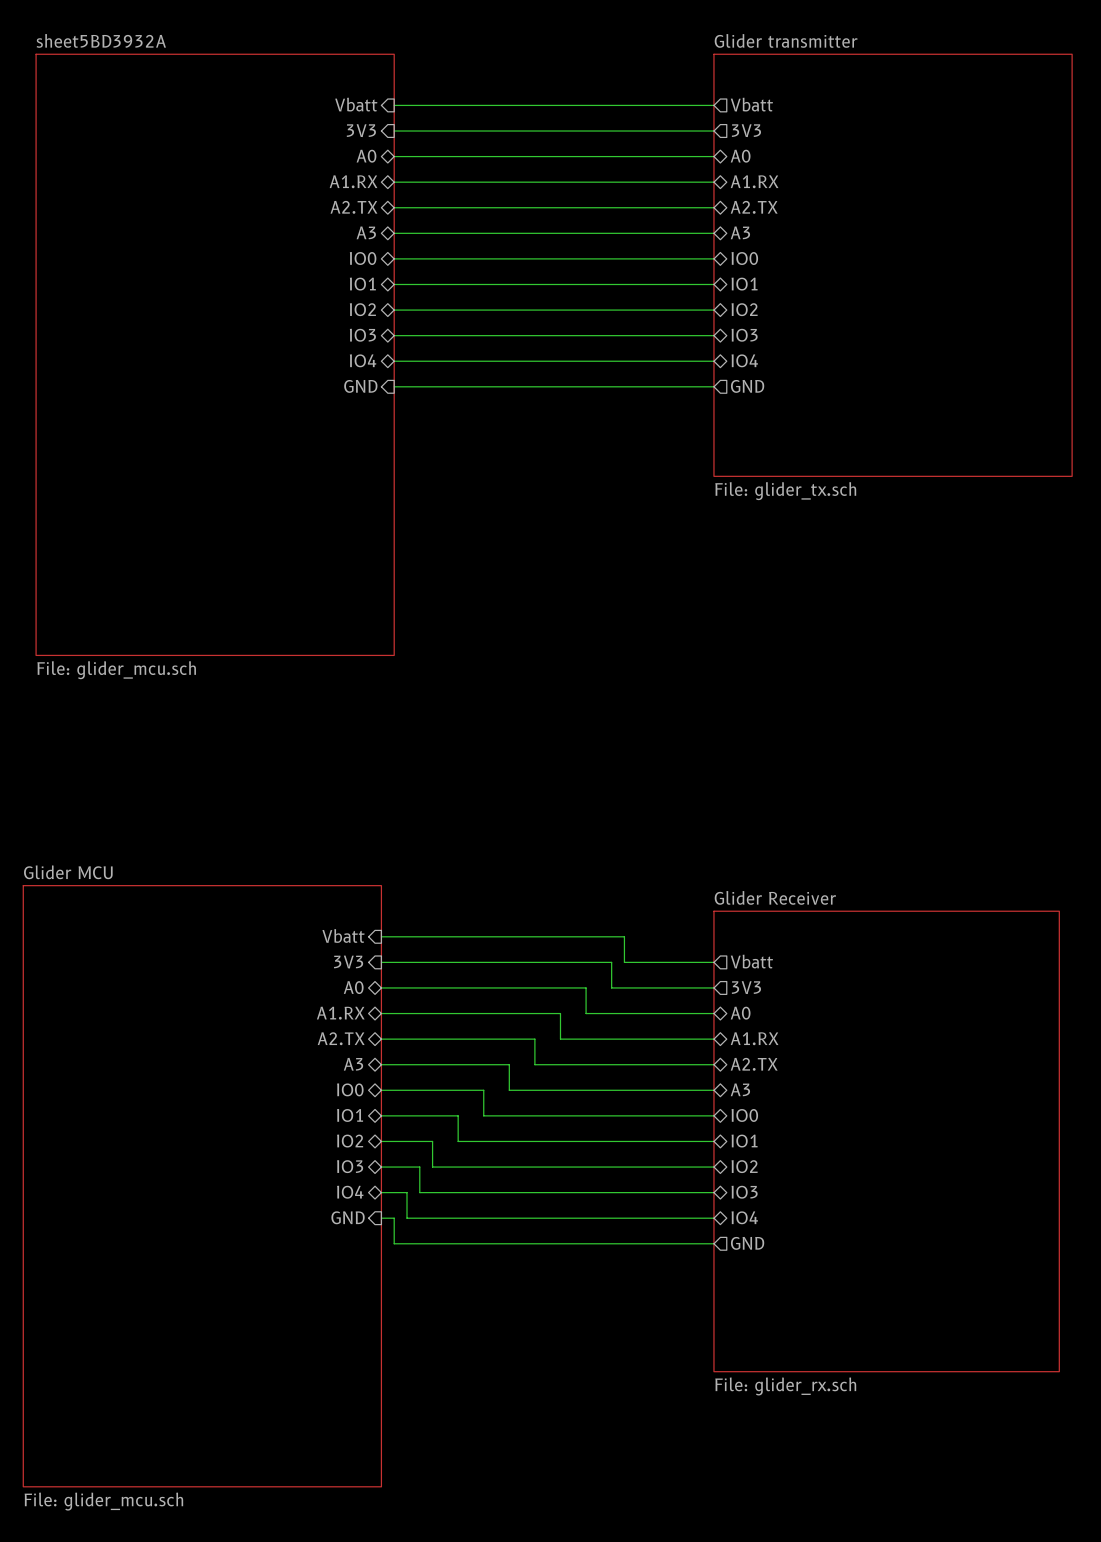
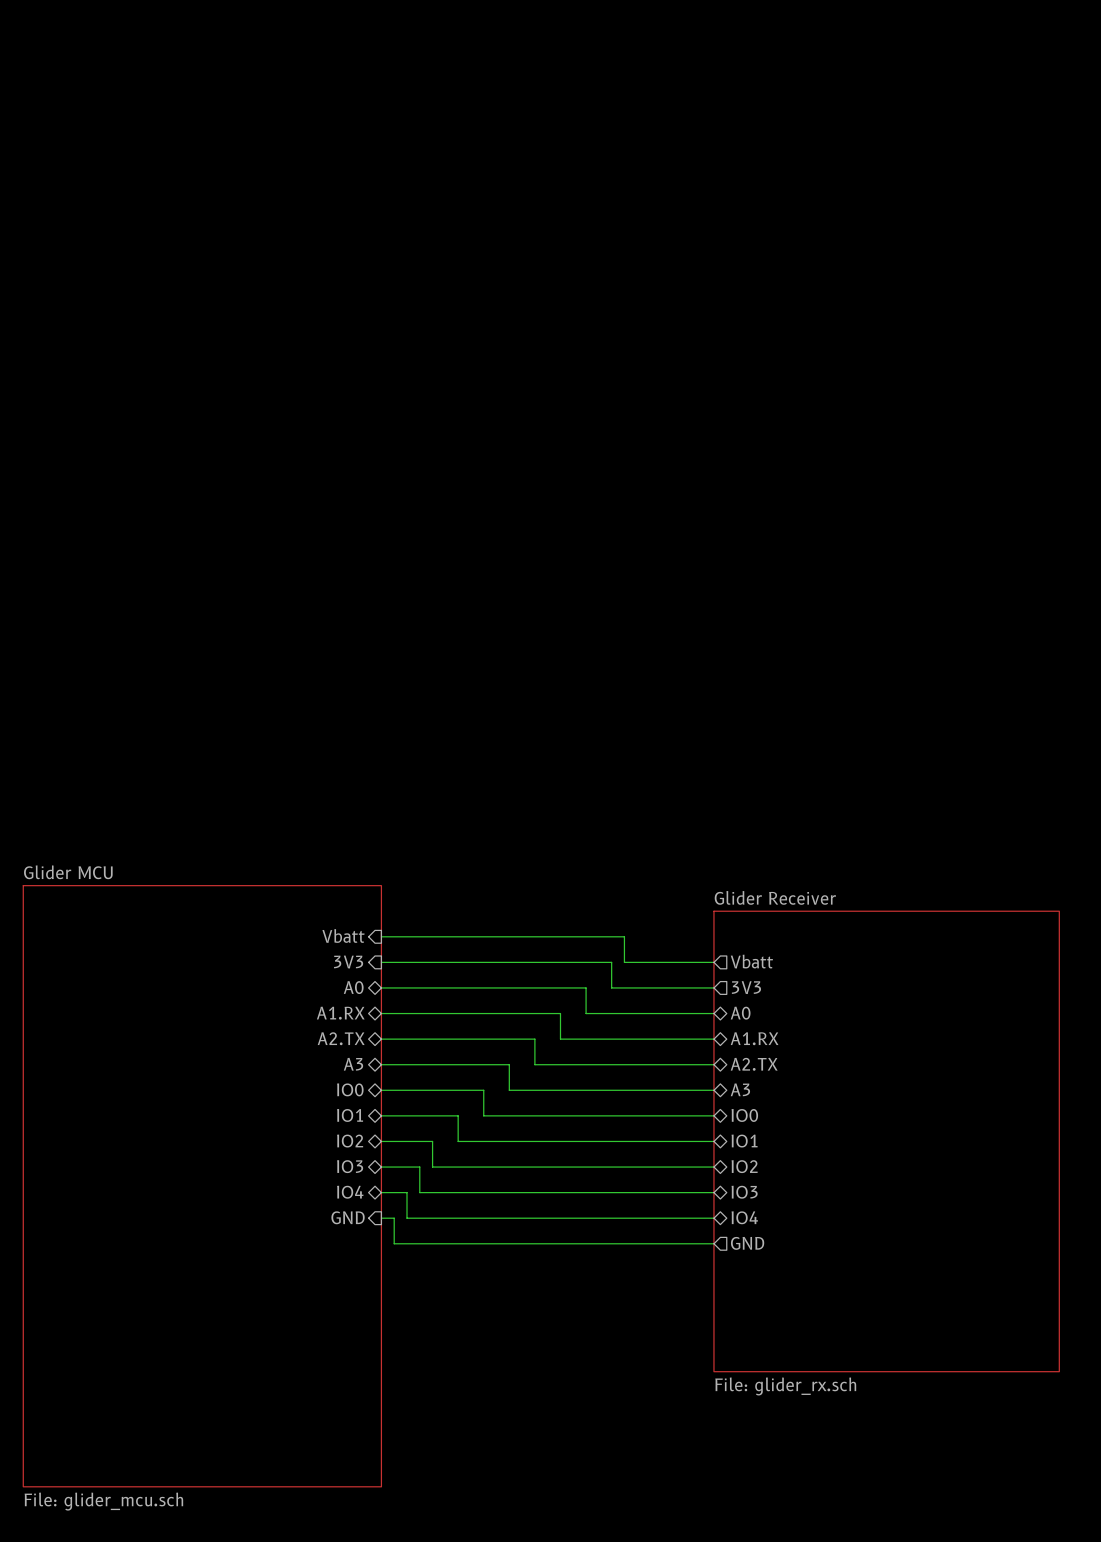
sheet pin: Vbatt (356, 104) -> none
sheet pin: Vbatt (751, 104) -> none
wire: (394, 105) (713, 105) -> none
sheet pin: 3V3 (361, 130) -> none
sheet pin: 3V3 (746, 130) -> none
wire: (394, 131) (713, 131) -> none
sheet pin: A0 (366, 156) -> none
wire: (394, 156) (713, 156) -> none
sheet pin: A0 (740, 156) -> none
sheet pin: A1.RX (353, 181) -> none
sheet pin: A1.RX (754, 181) -> none
wire: (394, 182) (713, 182) -> none
sheet pin: A2.TX (353, 207) -> none
wire: (394, 207) (713, 207) -> none
sheet pin: A2.TX (754, 207) -> none
sheet pin: A3 (366, 232) -> none
sheet pin: A3 (740, 232) -> none
wire: (394, 233) (713, 233) -> none
sheet pin: IO0 (363, 258) -> none
wire: (394, 258) (713, 258) -> none
sheet pin: IO0 (744, 258) -> none
sheet Glider transmitter: File: glider_tx.sch (893, 265) -> none
sheet pin: IO1 (362, 284) -> none
wire: (394, 284) (713, 284) -> none
sheet pin: IO1 (744, 284) -> none
sheet pin: IO2 (362, 309) -> none
sheet pin: IO2 (744, 309) -> none
wire: (394, 310) (713, 310) -> none
sheet pin: IO3 (362, 335) -> none
wire: (394, 335) (713, 335) -> none
sheet pin: IO3 (744, 335) -> none
sheet sheet5BD3932A: File: glider_mcu.sch (215, 354) -> none
sheet pin: IO4 (363, 360) -> none
sheet pin: IO4 (744, 360) -> none
wire: (394, 361) (713, 361) -> none
sheet pin: GND (360, 386) -> none
wire: (394, 386) (713, 386) -> none
sheet pin: GND (747, 386) -> none

